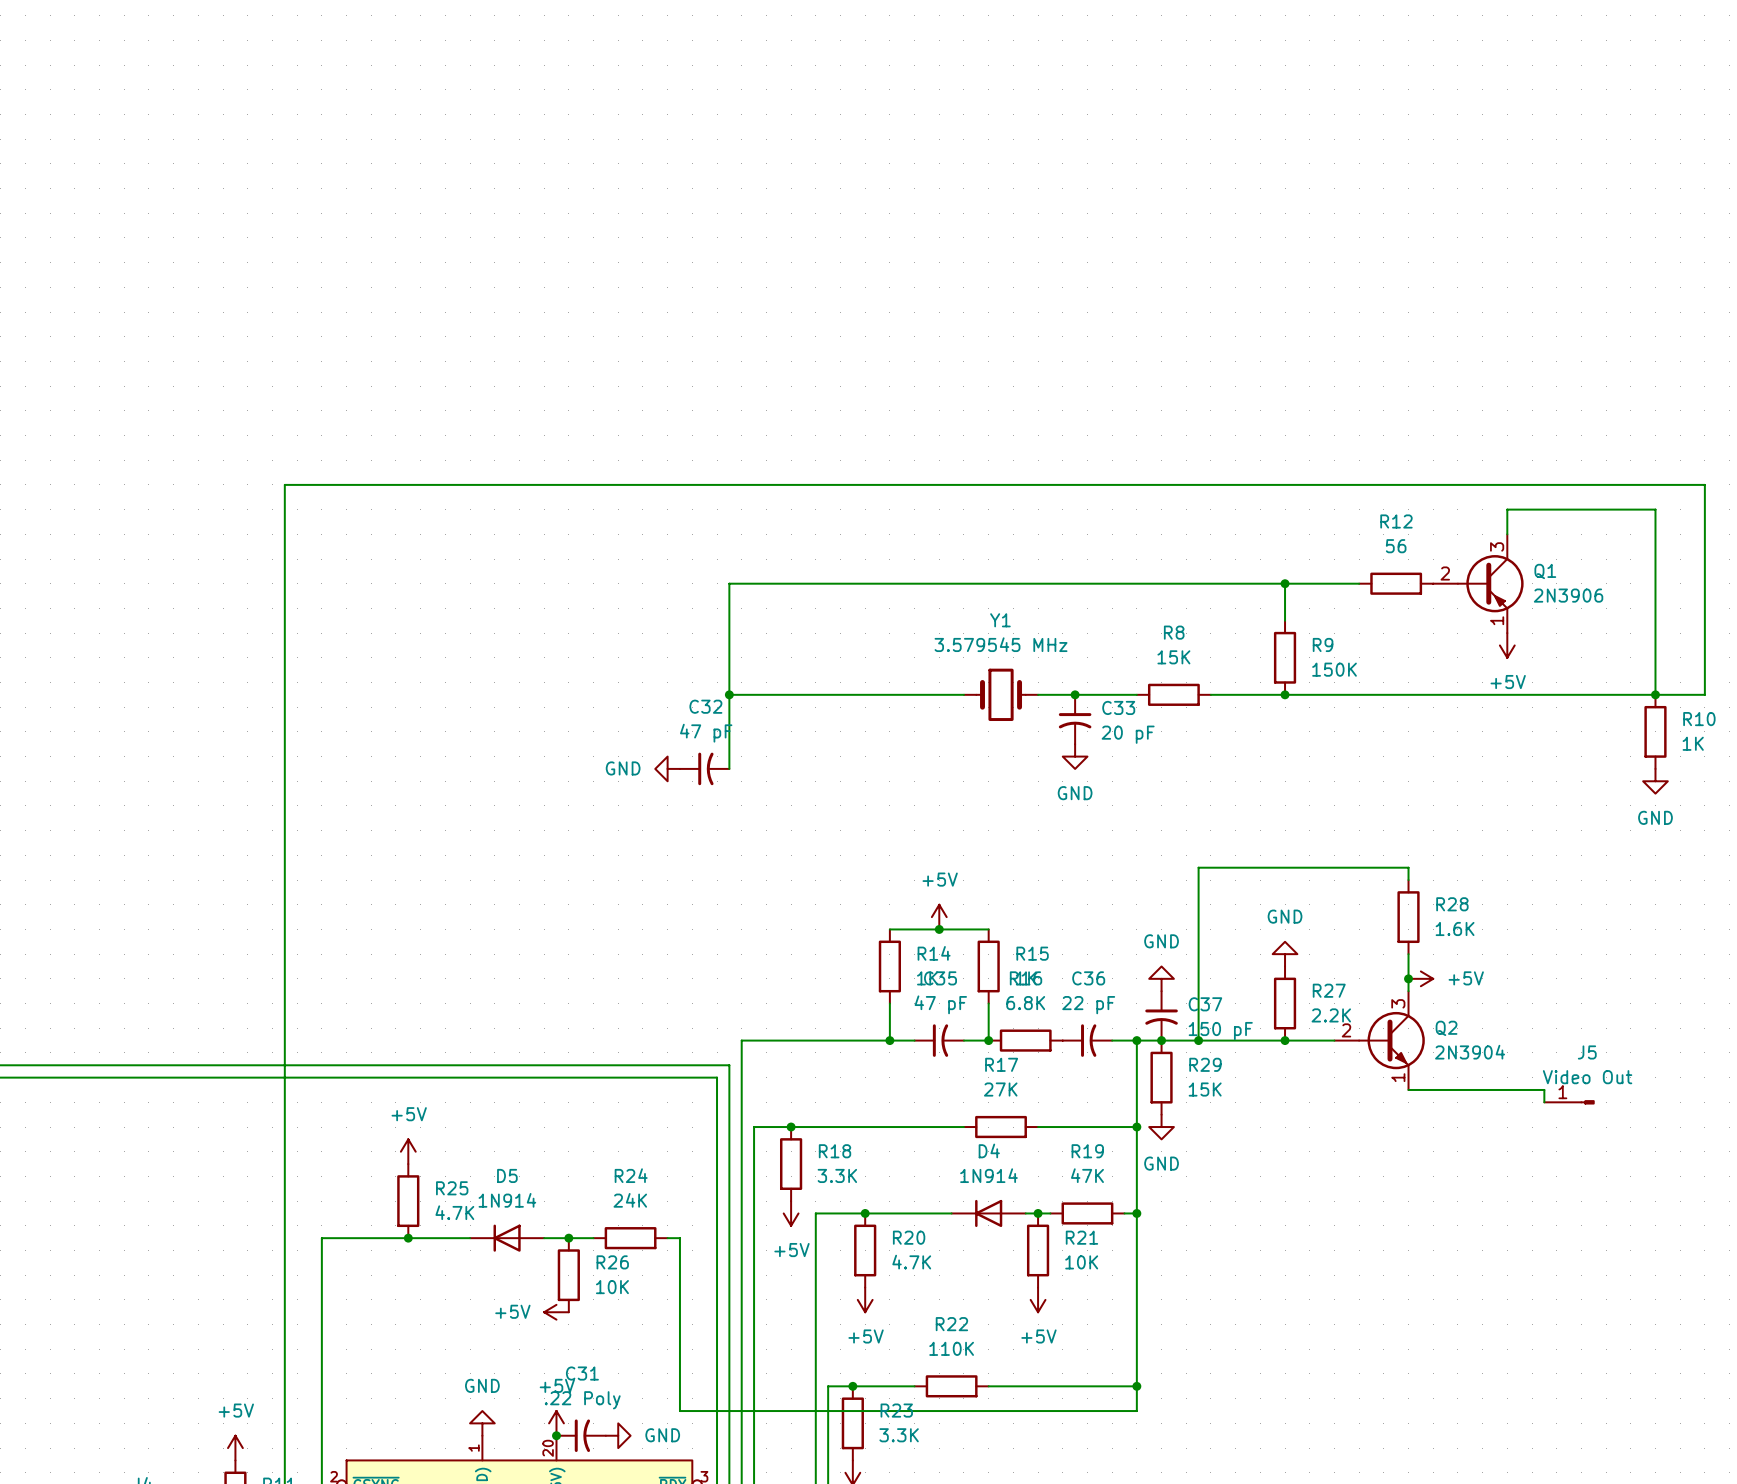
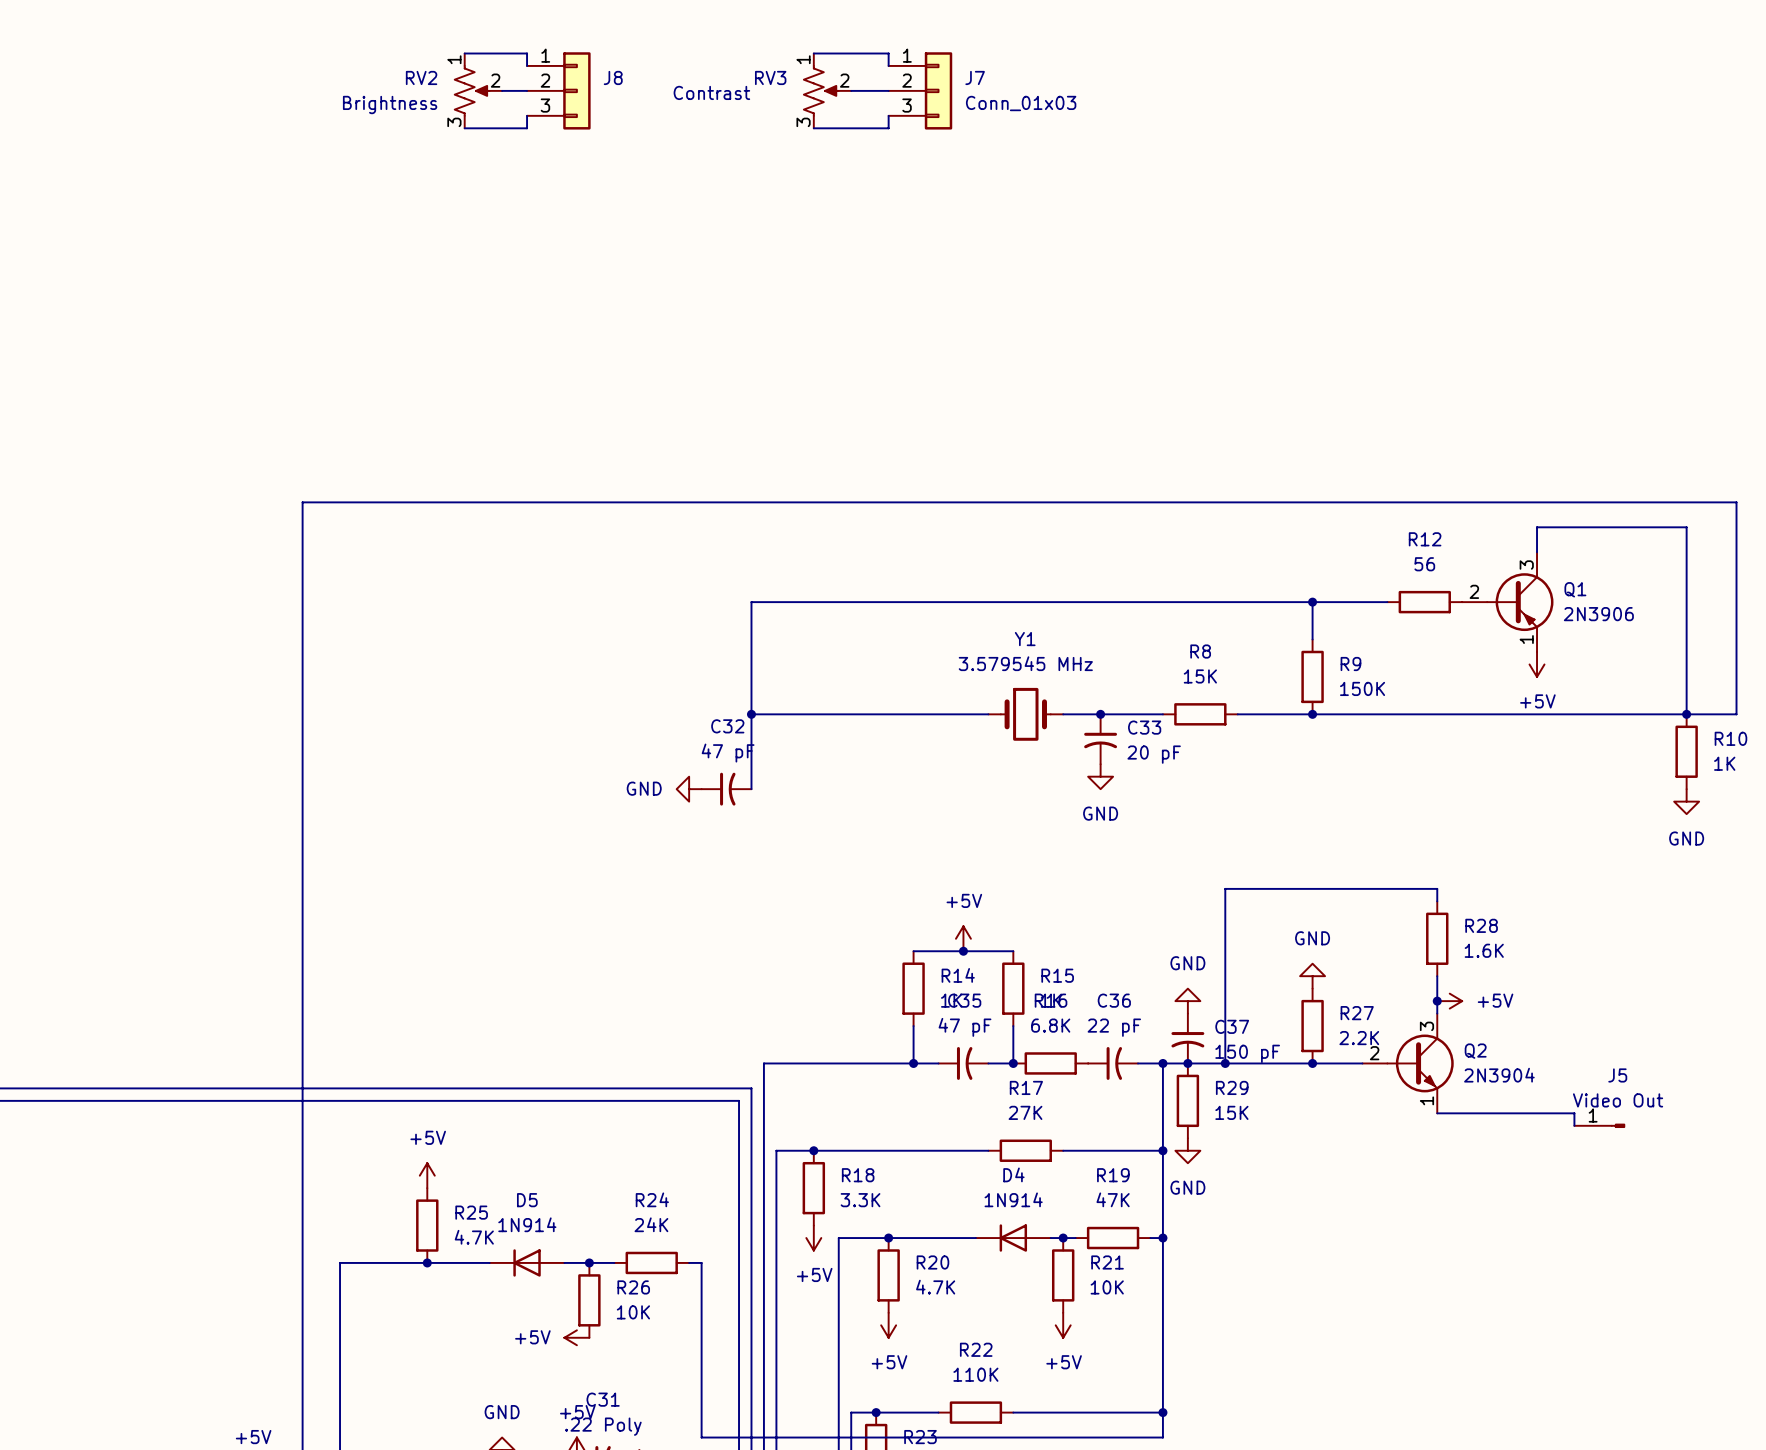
wire: none -> (464, 53) (527, 53) (527, 65)
wire: none -> (813, 53) (888, 53) (888, 65)
RV2: none -> Brightness (478, 90)
wire: none -> (502, 90) (527, 90)
J8: none -> (558, 90)
RV3: none -> Contrast (827, 90)
wire: none -> (851, 90) (888, 90)
J7: none -> Conn_01x03 (920, 90)
wire: none -> (527, 115) (527, 128) (464, 128)
wire: none -> (888, 115) (888, 128) (813, 128)

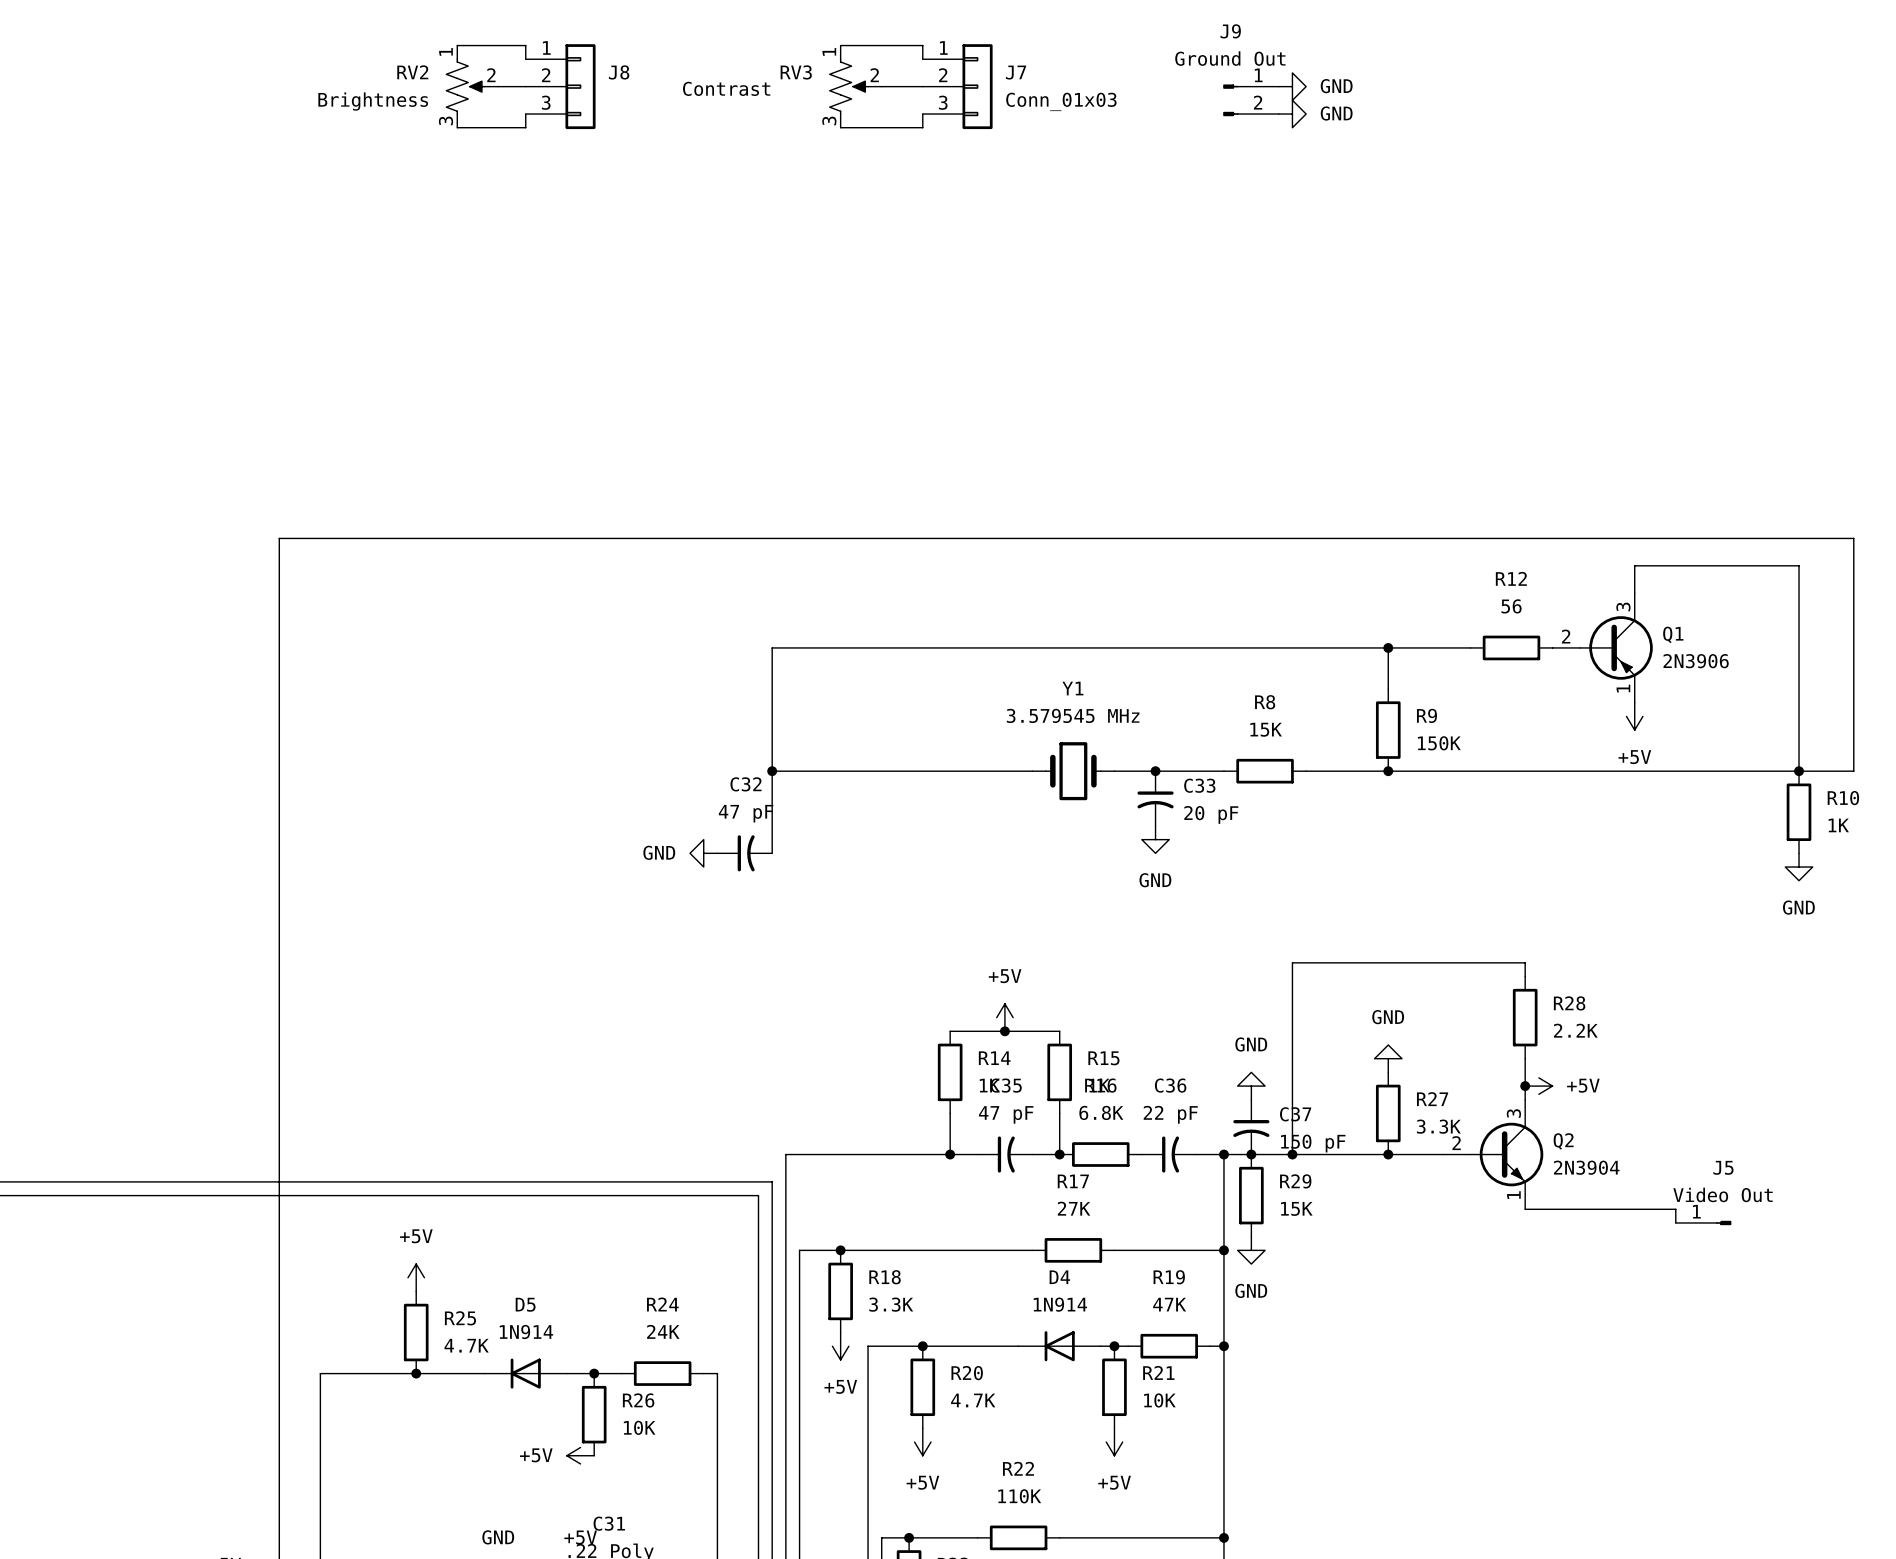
power symbol: none -> GND (1292, 86)
J9: none -> Ground Out (1250, 100)
power symbol: none -> GND (1292, 114)
R28 value: 1.6K (1484, 950) -> 2.2K (1575, 1030)
R27 value: 2.2K (1359, 1038) -> 3.3K (1438, 1126)

